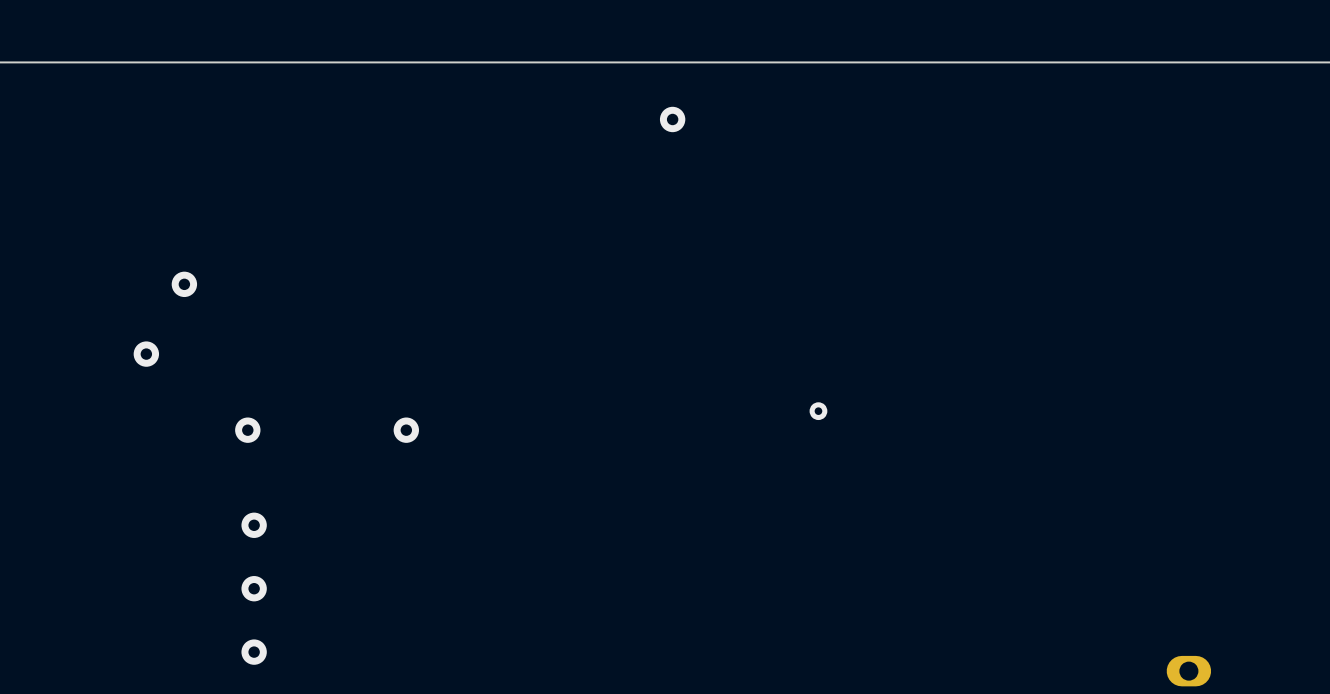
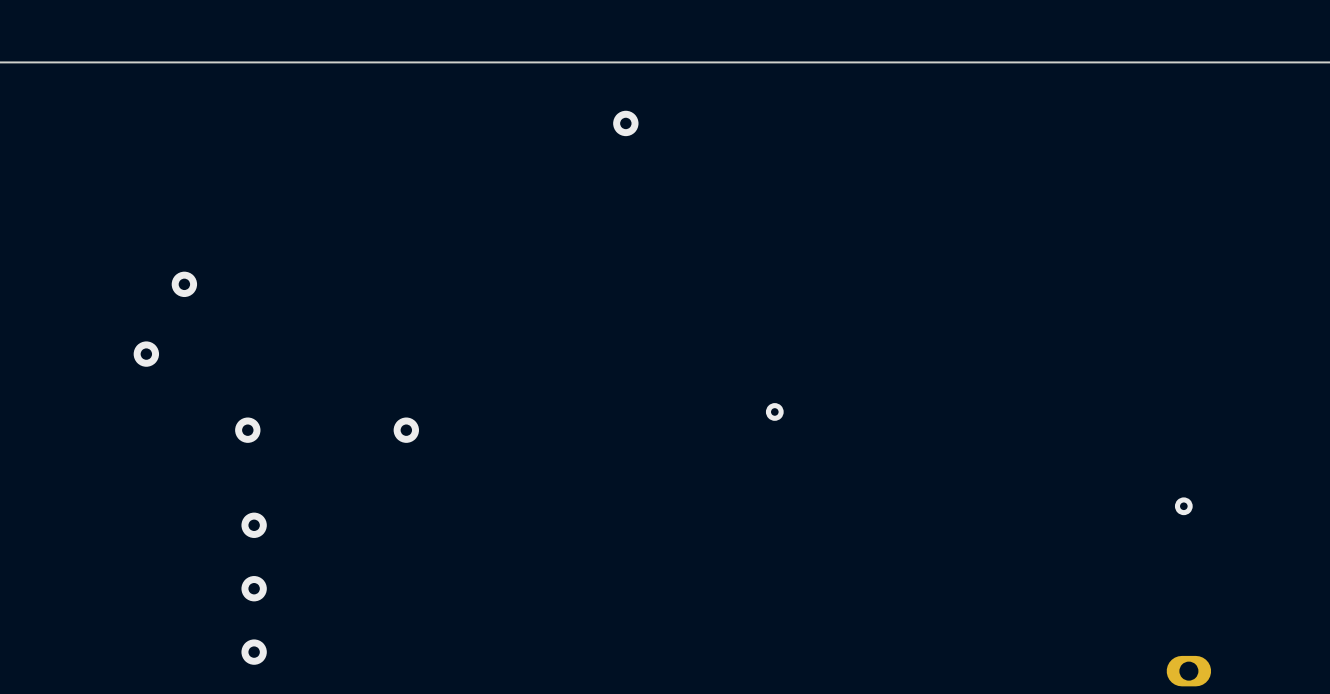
via position: (672, 119) -> (625, 123)
via position: (818, 411) -> (774, 411)
via: none -> (1183, 506)

